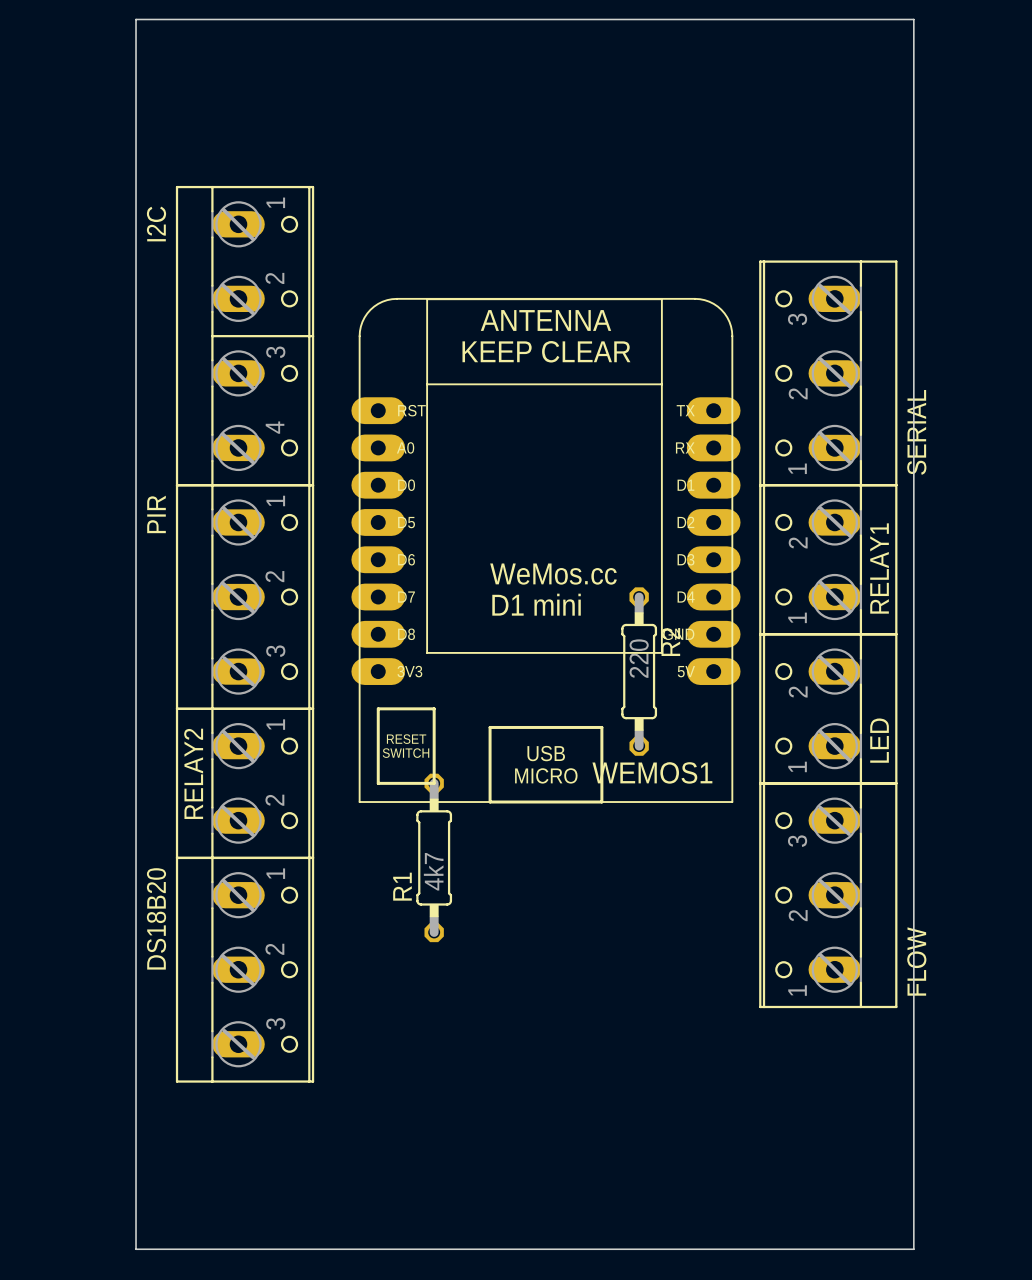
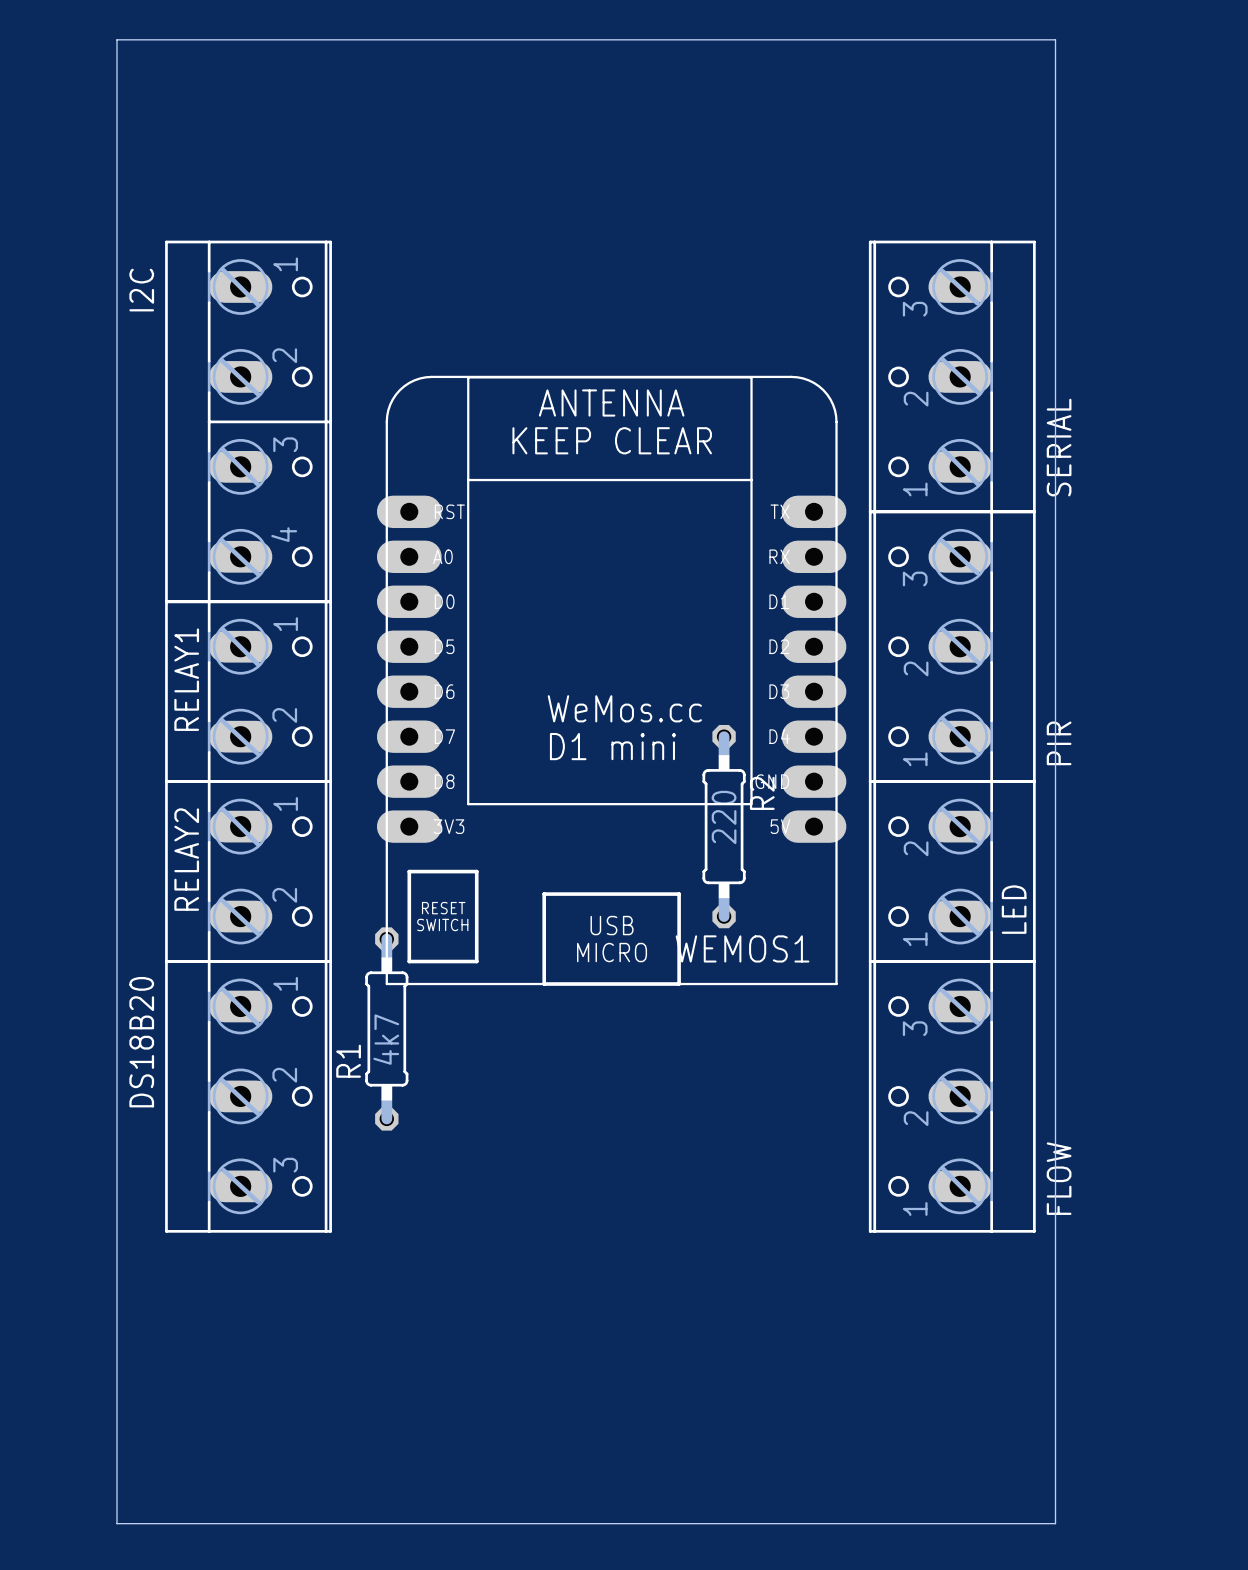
SERIAL position: (828, 373) -> (952, 376)
RELAY1 footprint: [759, 484, 898, 636] -> [165, 600, 332, 784]
PIR: none -> (952, 646)
RELAY1 name position: RELAY1 (879, 568) -> RELAY1 (186, 679)
PIR: (245, 597) -> none
RELAY2 position: (245, 783) -> (248, 871)
R1 position: (434, 857) -> (386, 1028)
DS18B20 position: (245, 969) -> (248, 1096)

